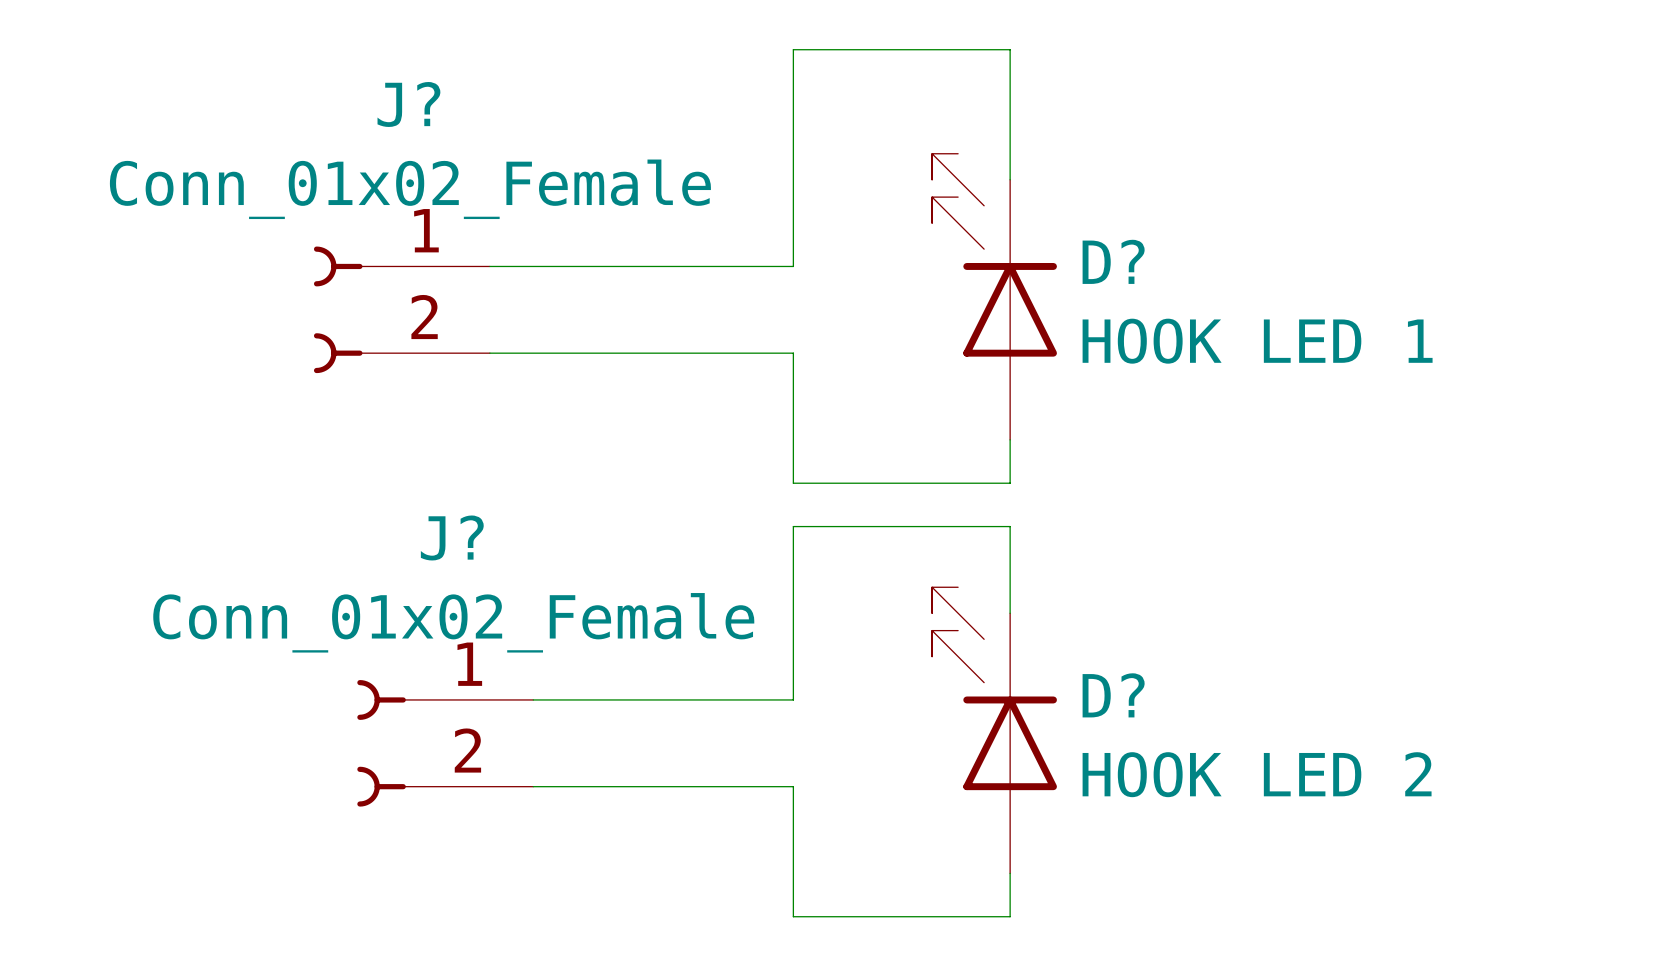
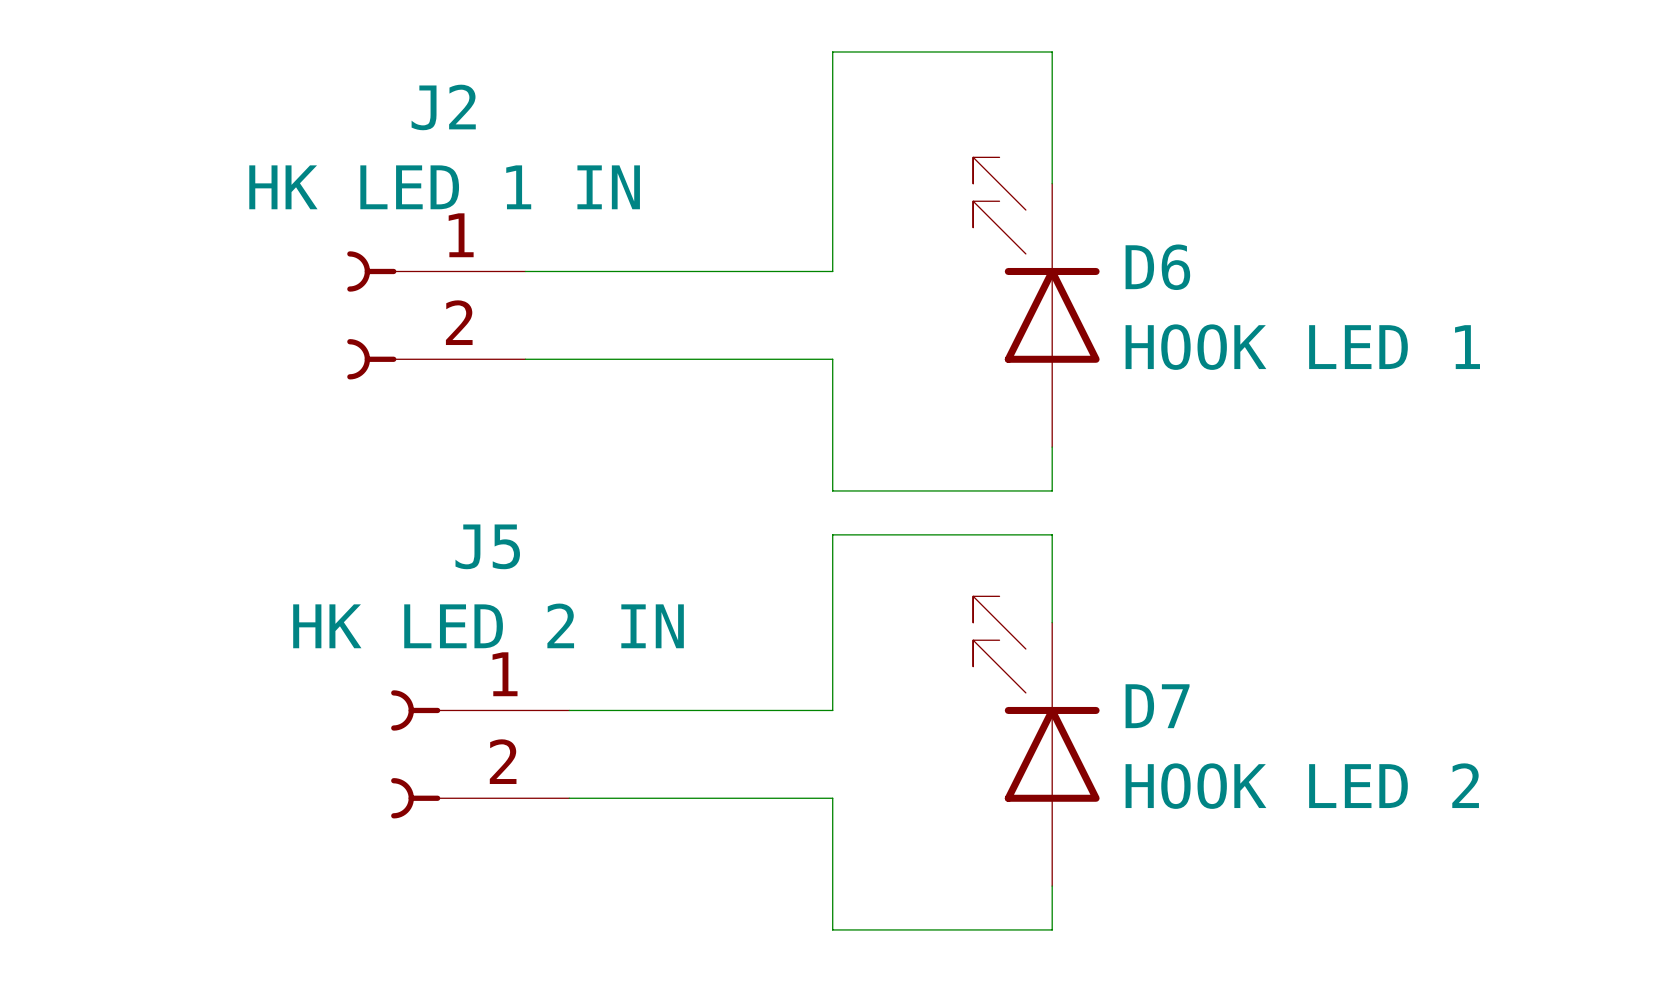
J? name: J? (408, 104) -> J2 (443, 107)
J? value: Conn_01x02_Female (410, 189) -> HK LED 1 IN (444, 187)
D? name: D? (1113, 261) -> D6 (1157, 267)
J? name: J? (452, 537) -> J5 (487, 546)
J? value: Conn_01x02_Female (453, 622) -> HK LED 2 IN (488, 625)
D? name: D? (1113, 695) -> D7 (1157, 706)

